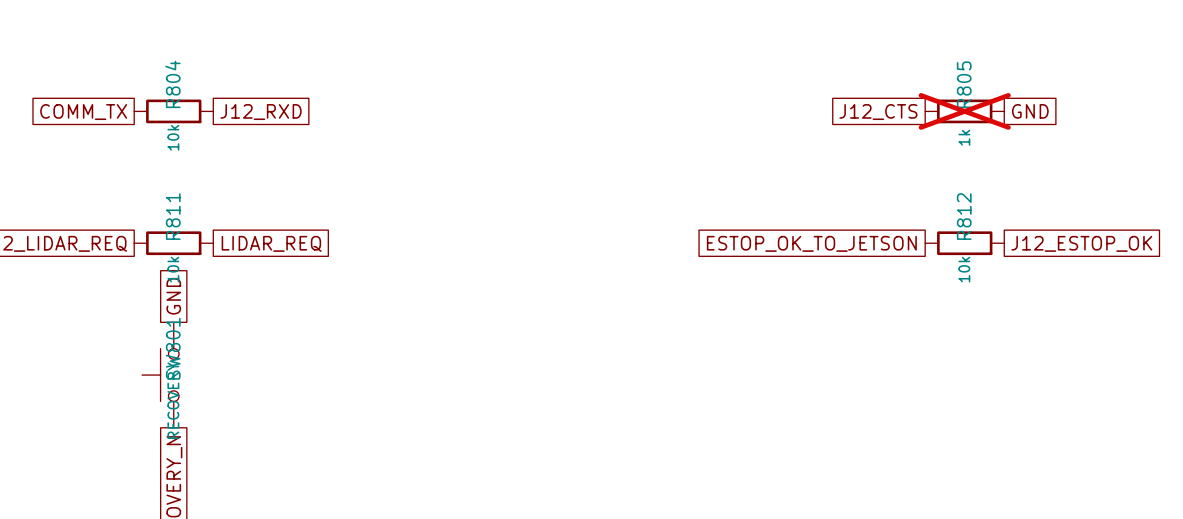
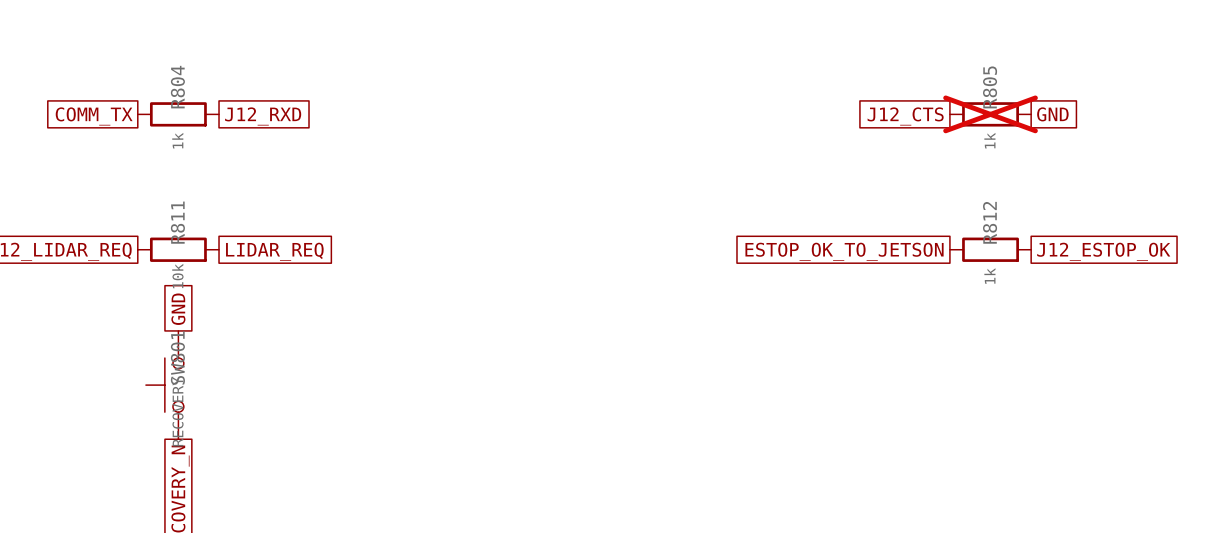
R804 value: 10k (173, 137) -> 1k (177, 140)
R812 value: 10k (964, 269) -> 1k (989, 276)

